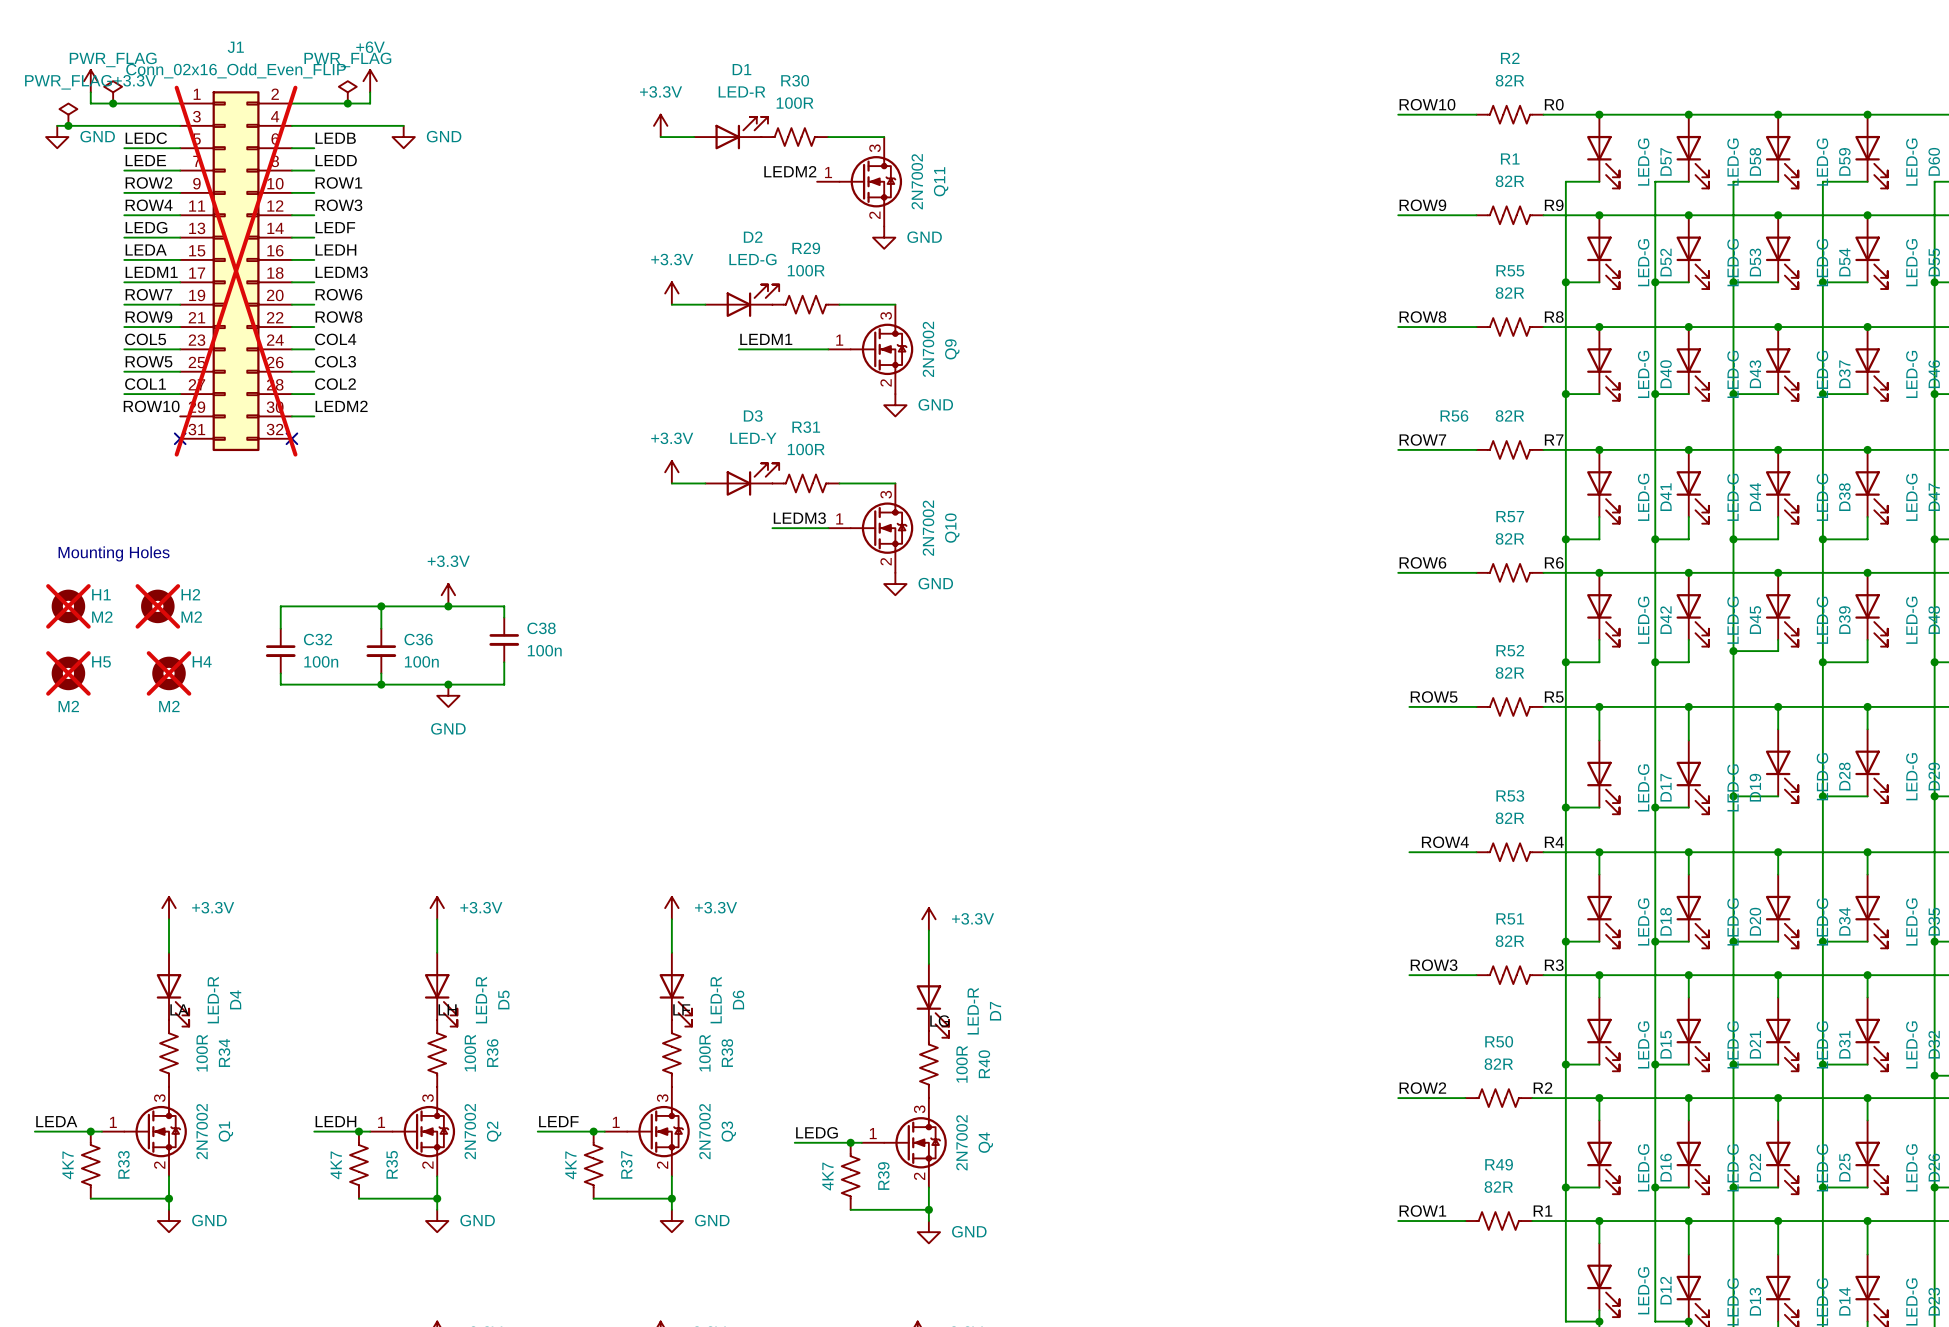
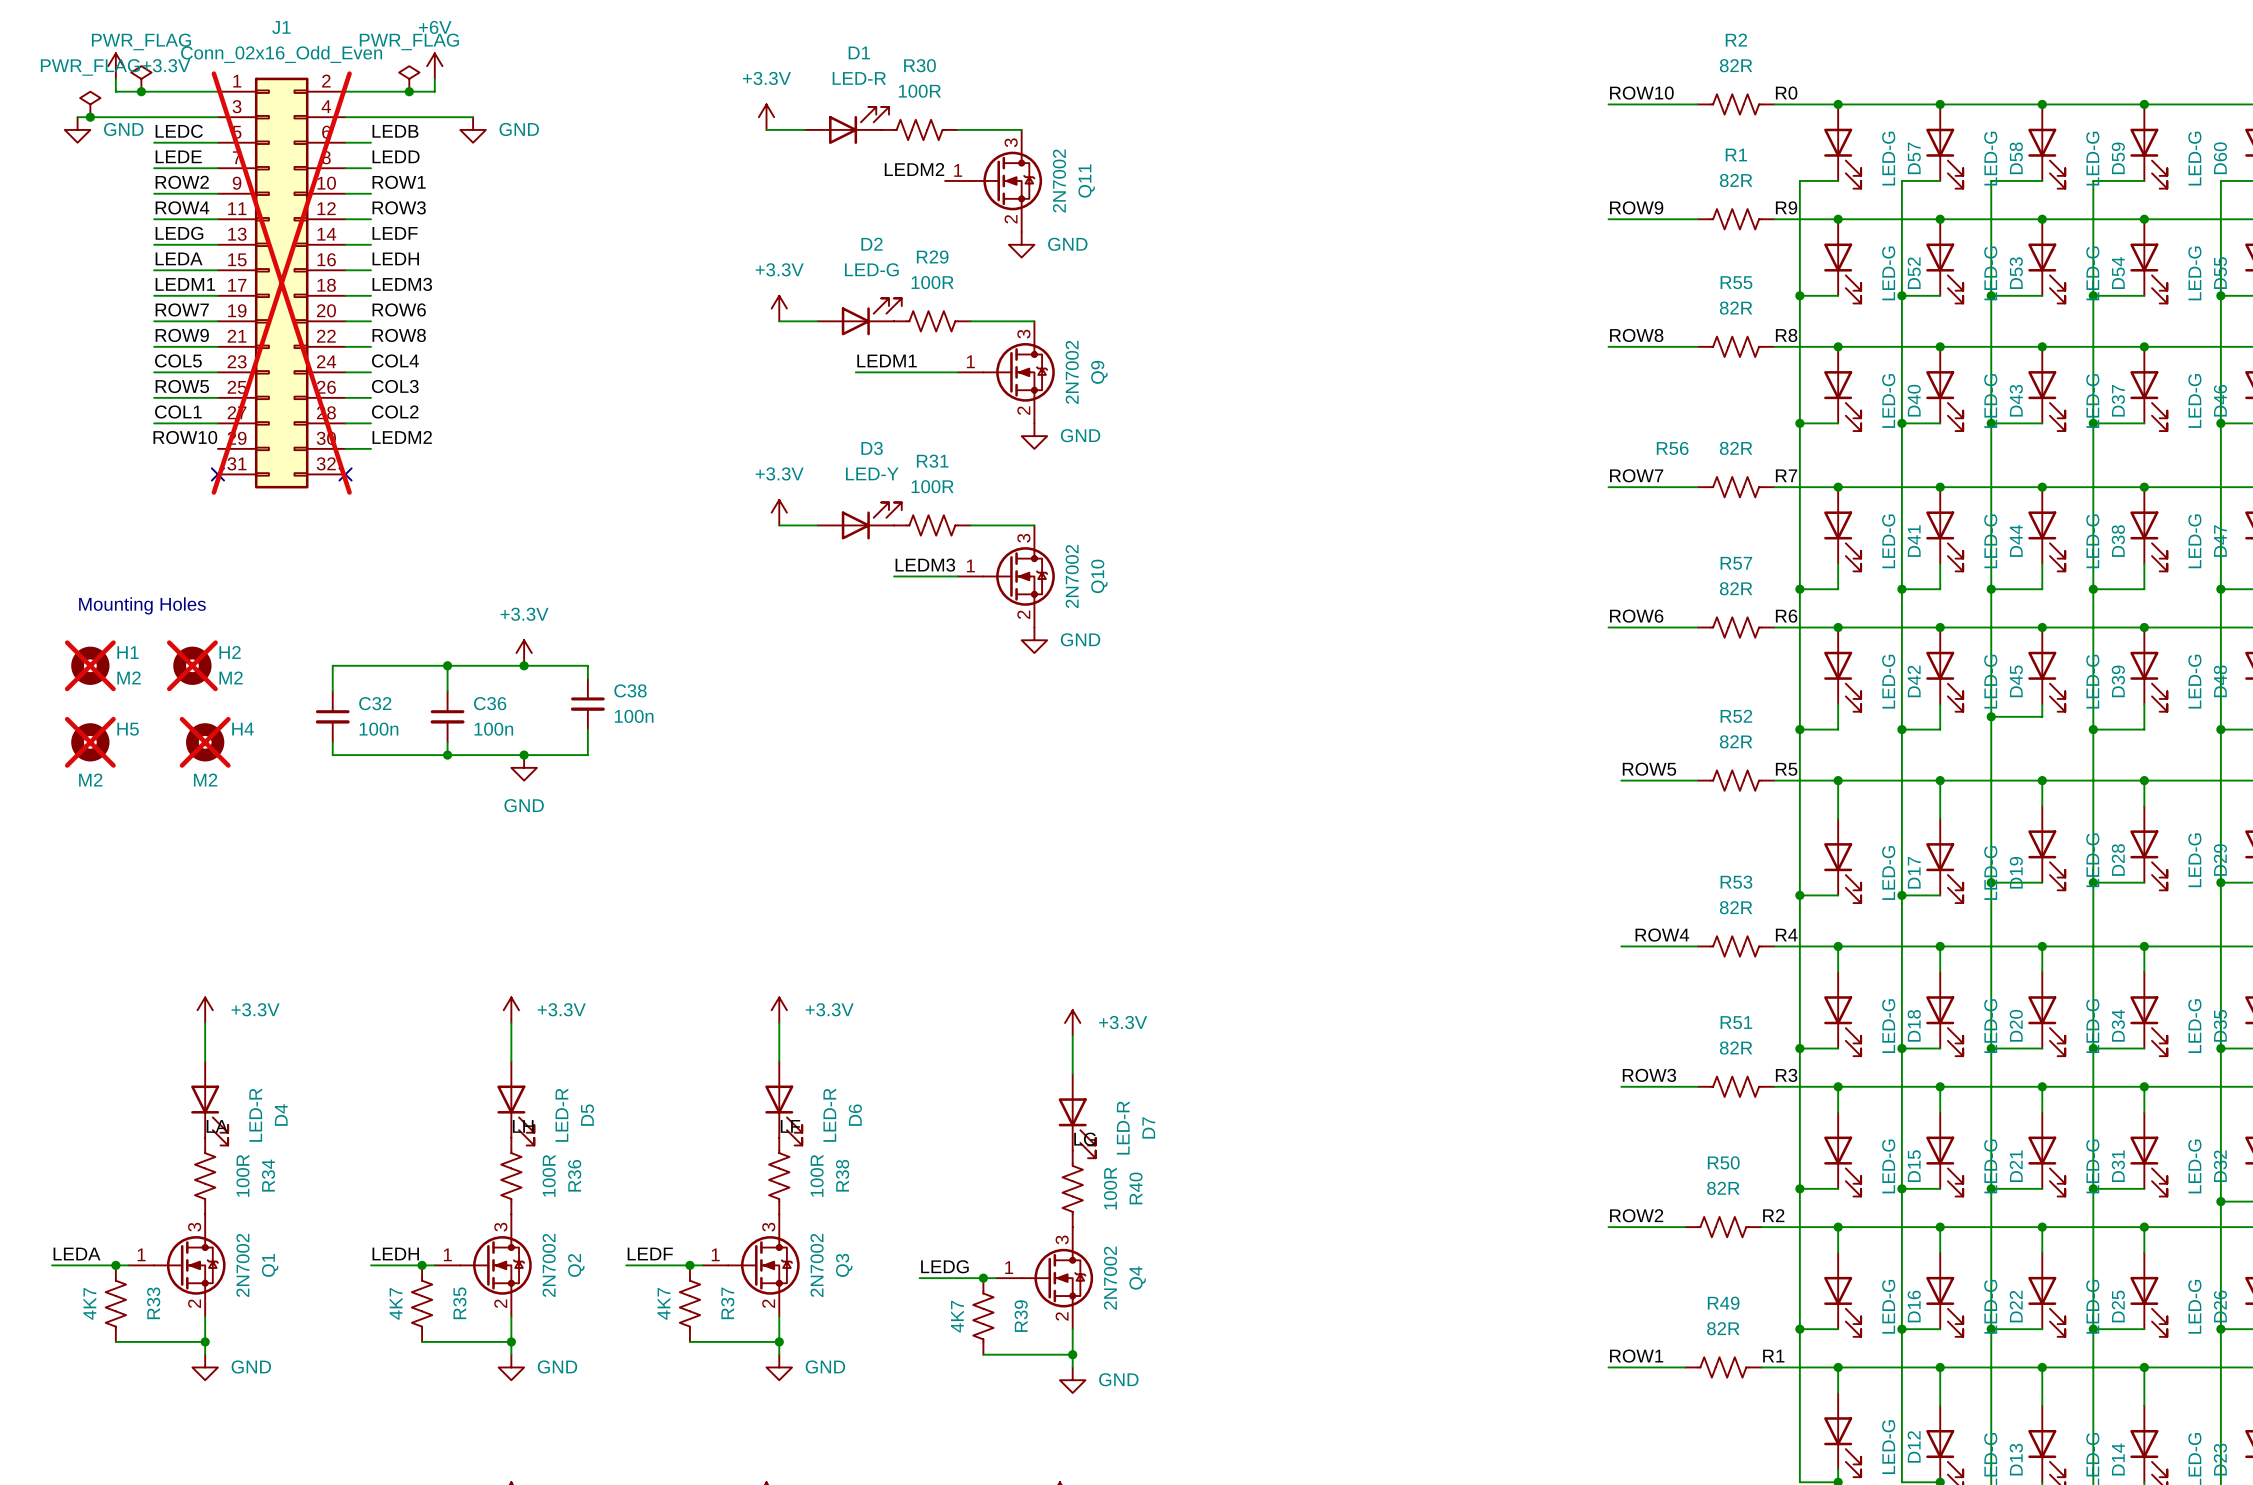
J1 value: Conn_02x16_Odd_Even_FLIP (236, 70) -> Conn_02x16_Odd_Even (281, 54)

